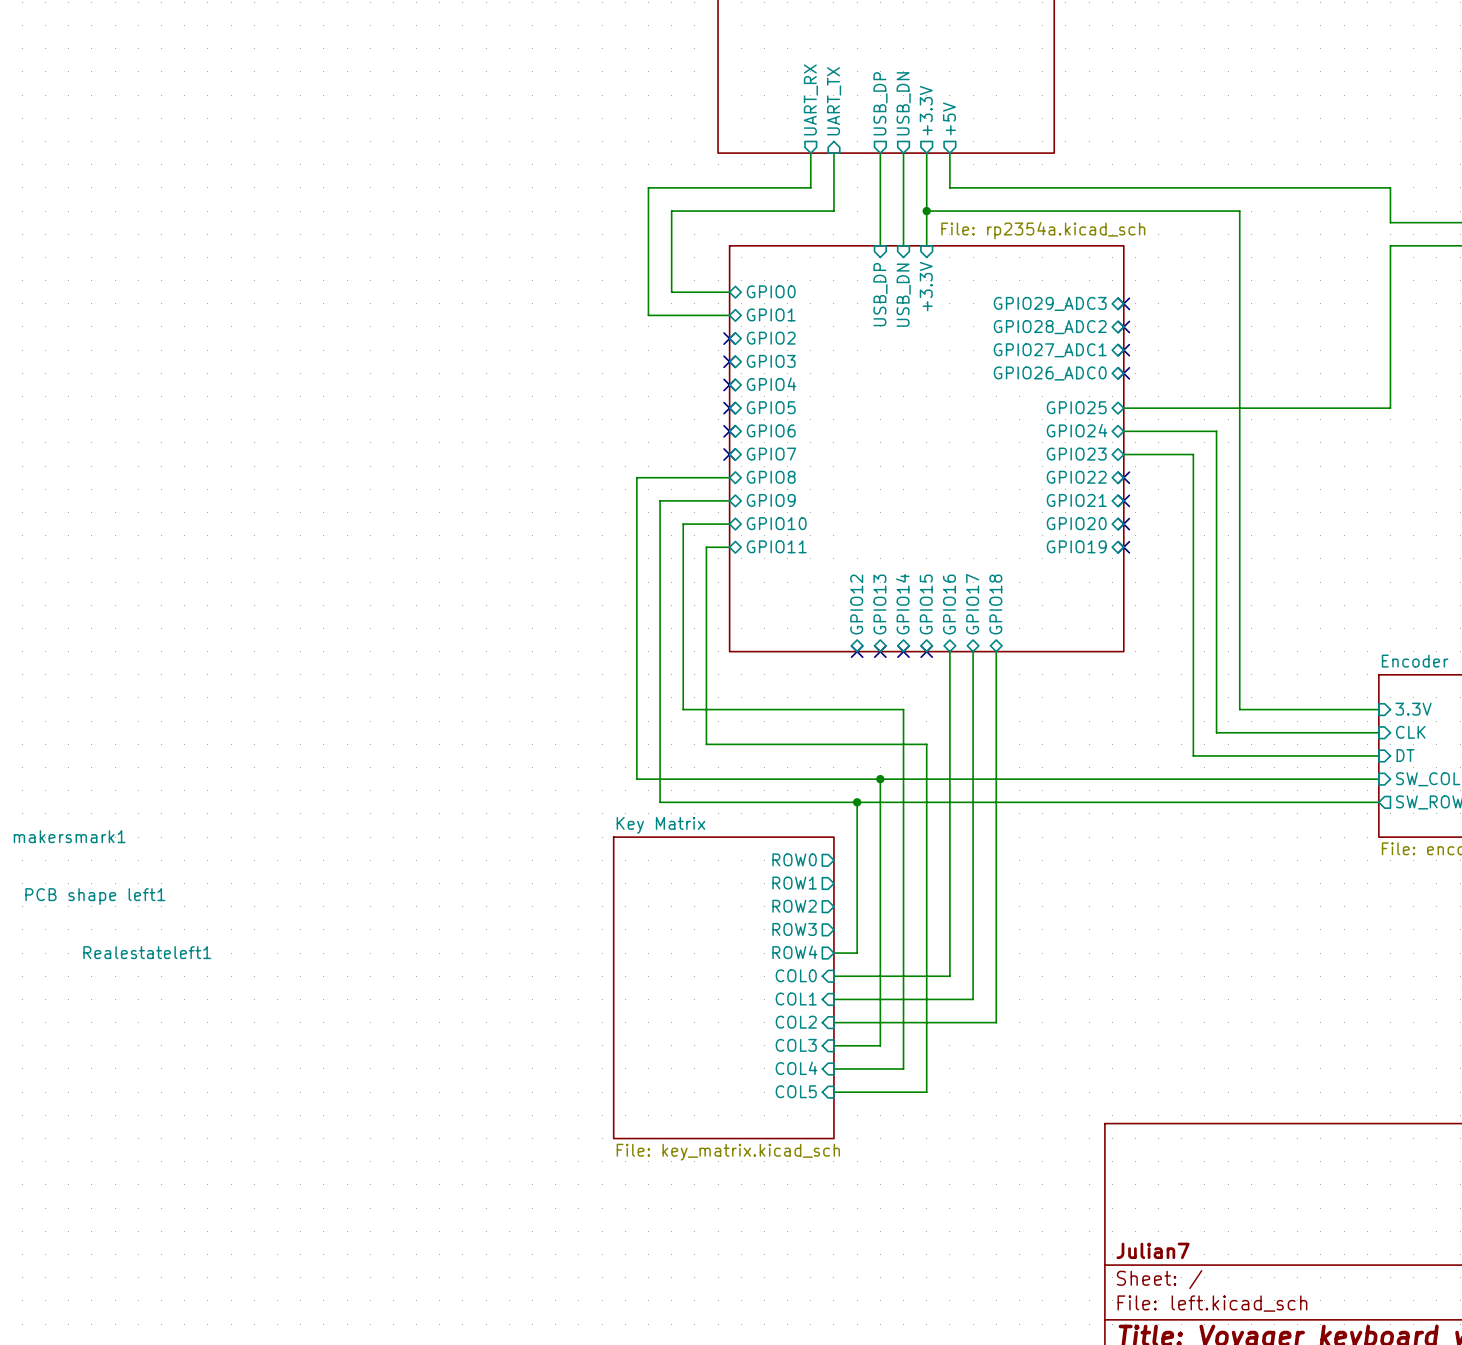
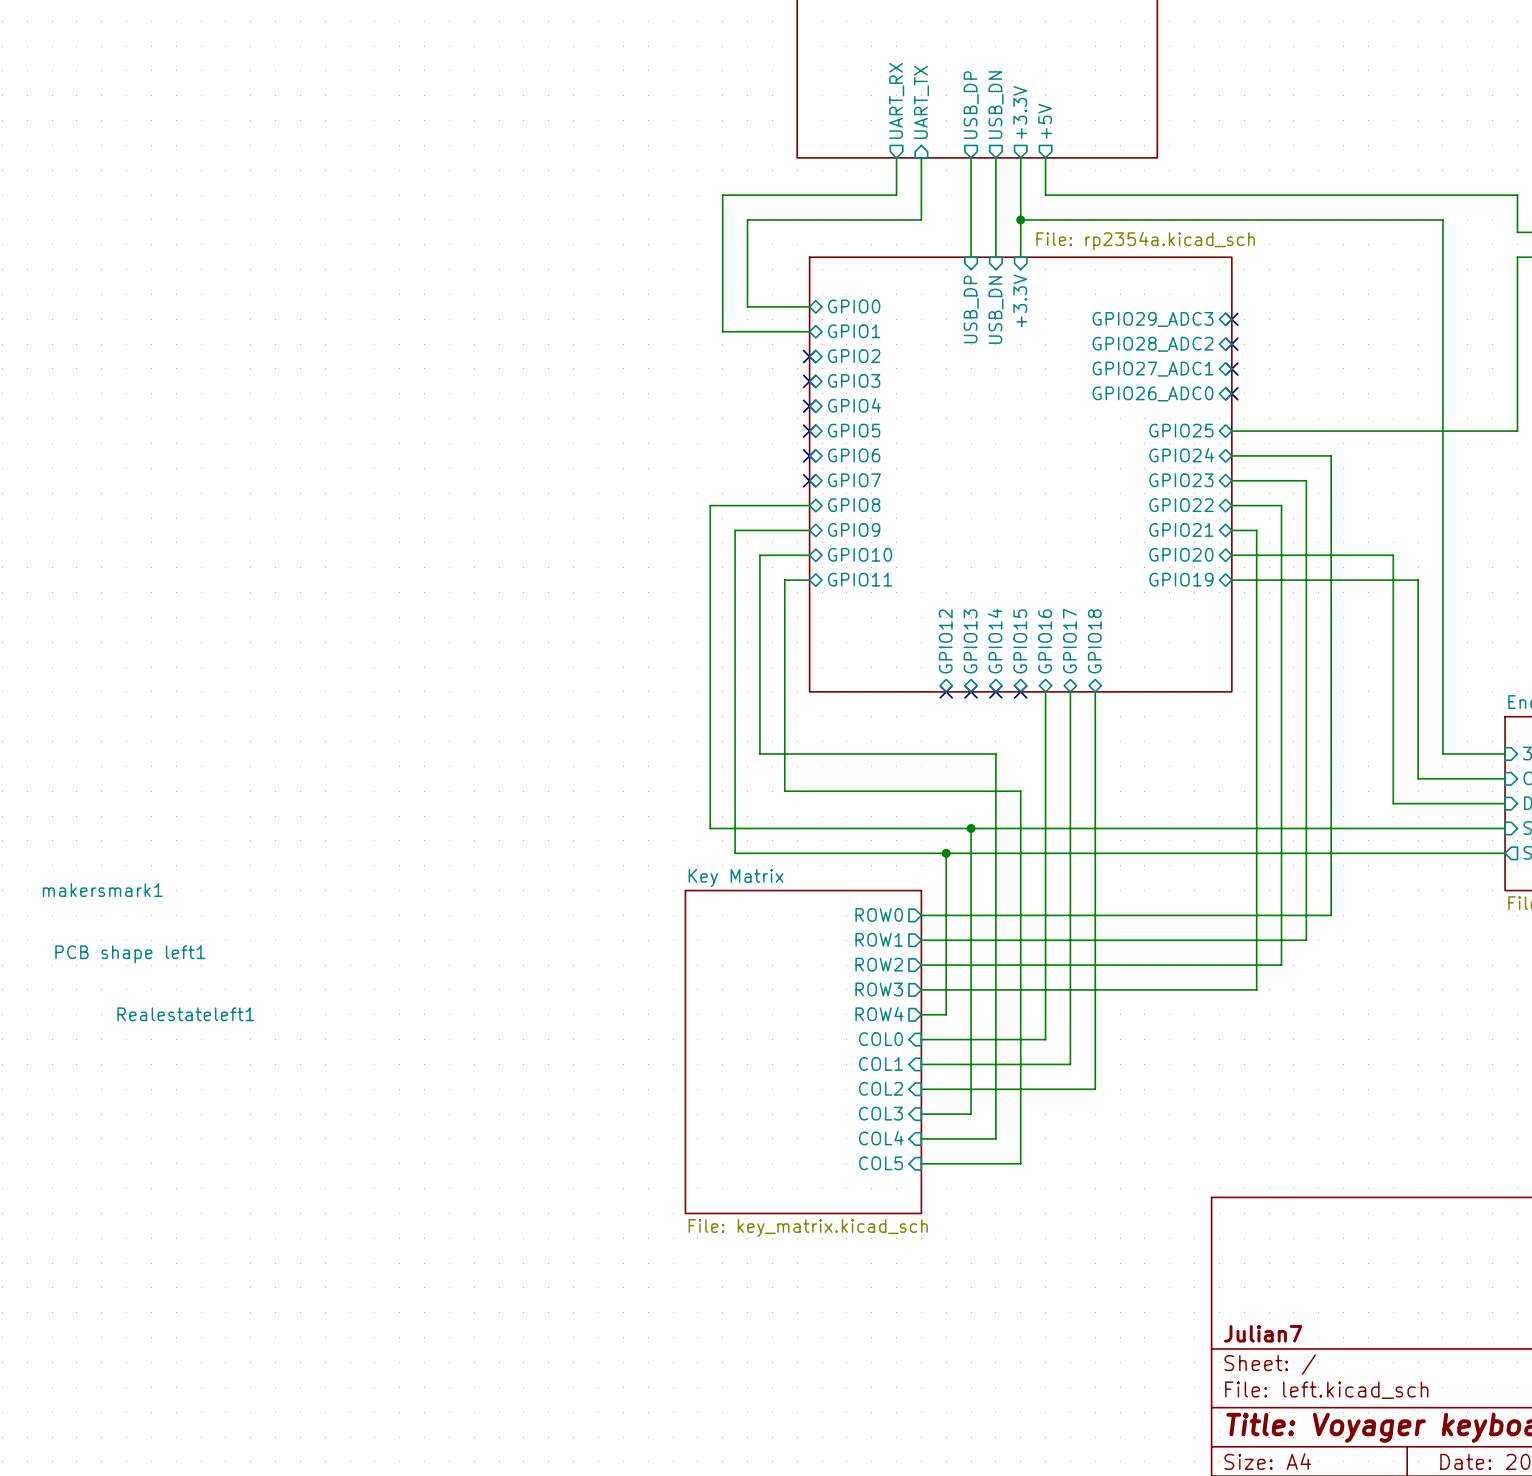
wire: (1239, 211) (1239, 709) (1320, 709) -> (1356, 219) (1442, 219) (1442, 753)
wire: none -> (1231, 505) (1281, 505) (1281, 965) (921, 965)
no-connect mark: (1123, 477) -> none
wire: none -> (1231, 530) (1256, 530) (1256, 989) (921, 989)
no-connect mark: (1123, 500) -> none
no-connect mark: (1123, 524) -> none
no-connect mark: (1123, 547) -> none
wire: (1216, 732) (1297, 732) -> (1231, 580) (1418, 580) (1418, 778)
wire: none -> (1331, 778) (1331, 915) (921, 915)
wire: (1193, 755) (1274, 755) -> (1231, 555) (1393, 555) (1393, 803)
wire: none -> (1306, 803) (1306, 940) (921, 940)

